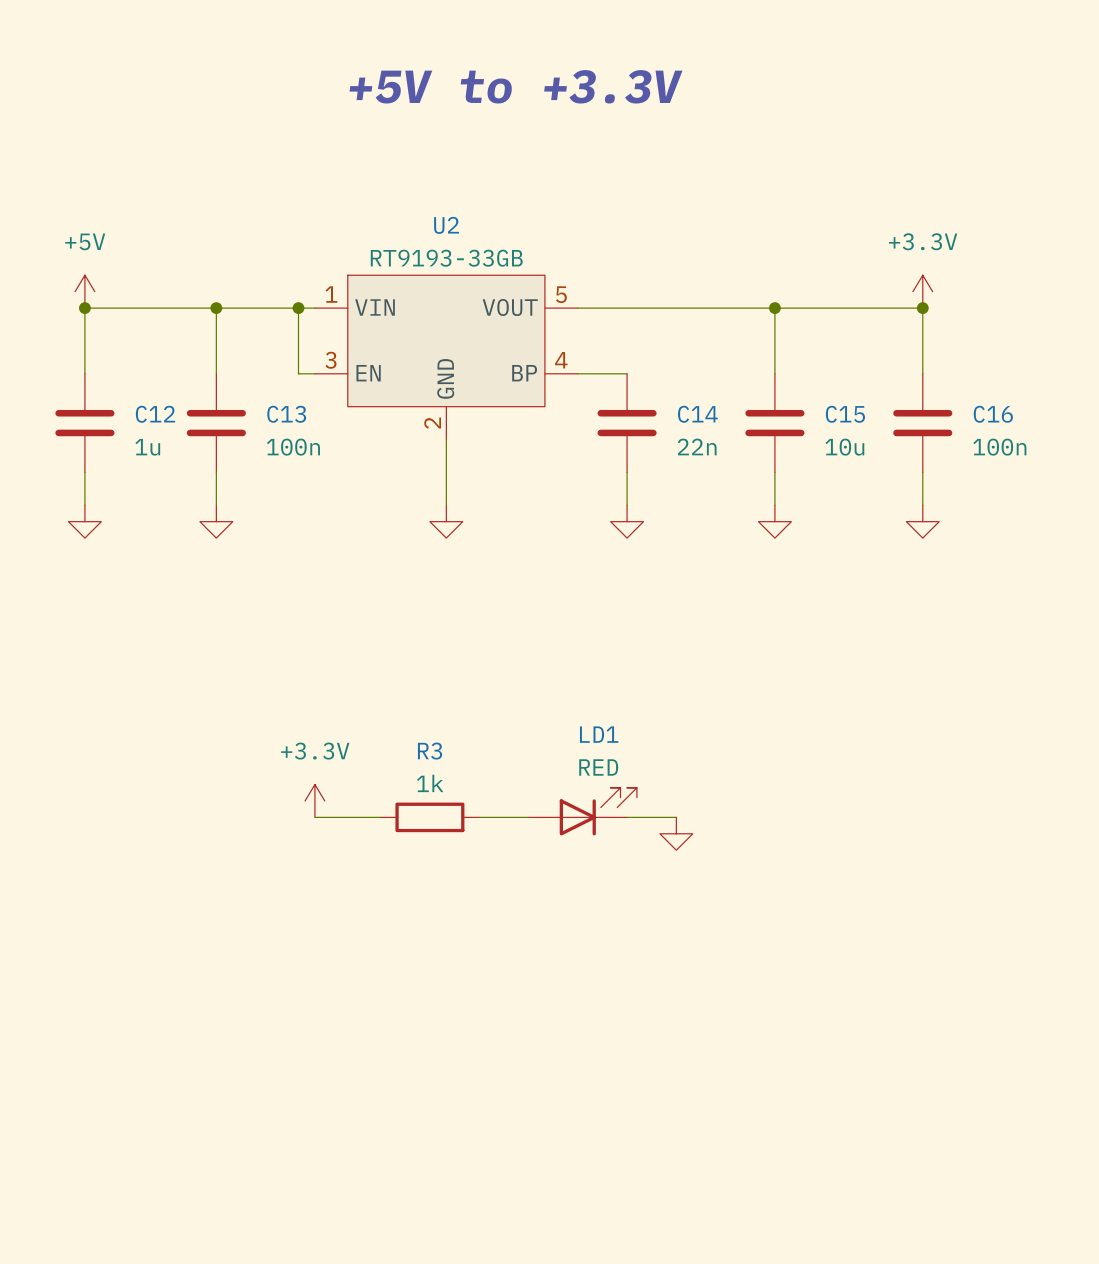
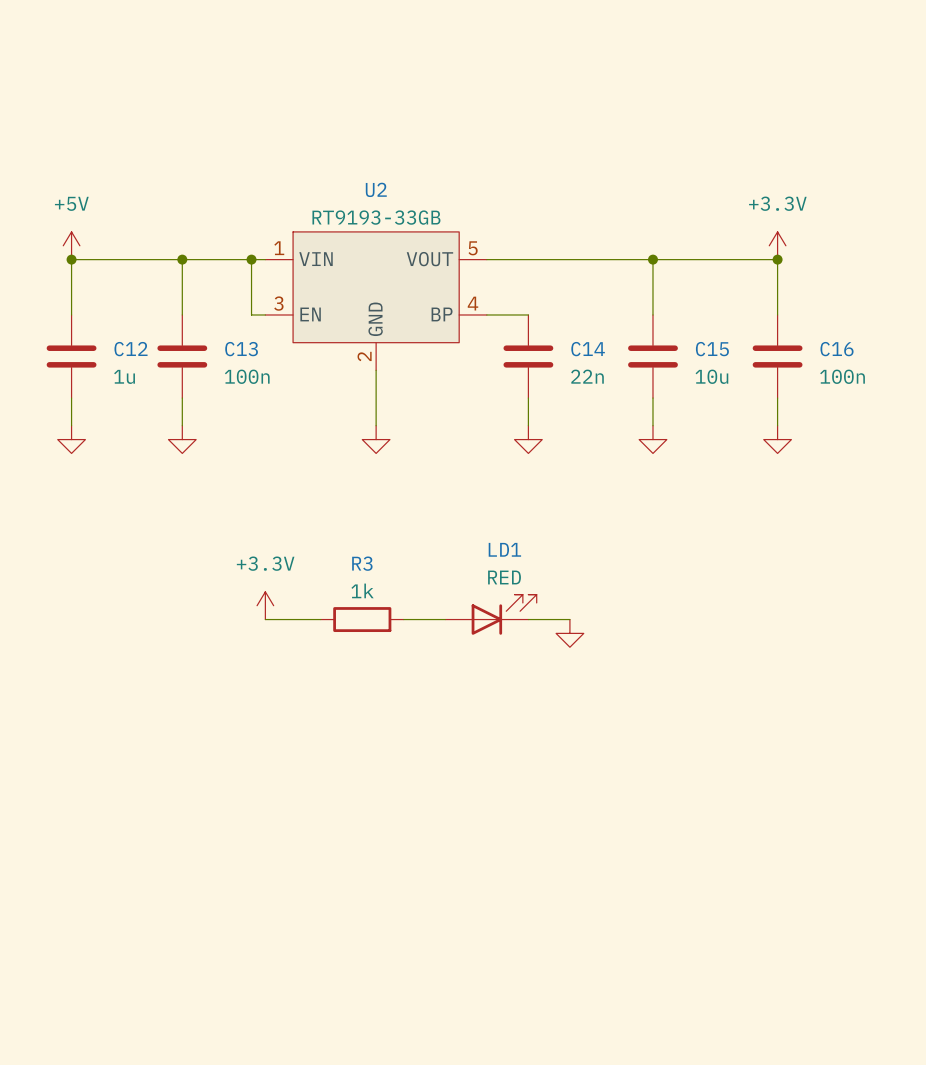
text: +5V to +3.3V (516, 86) -> none
power symbol position: +3.3V (314, 800) -> +3.3V (265, 605)
LD1 position: (582, 811) -> (491, 614)
wire: (314, 817) (380, 817) -> (265, 619) (320, 619)
R3 position: (429, 817) -> (362, 619)
wire: (479, 817) (528, 817) -> (403, 619) (445, 619)
wire: (627, 817) (676, 817) -> (528, 619) (569, 619)
power symbol position: (676, 833) -> (569, 633)

